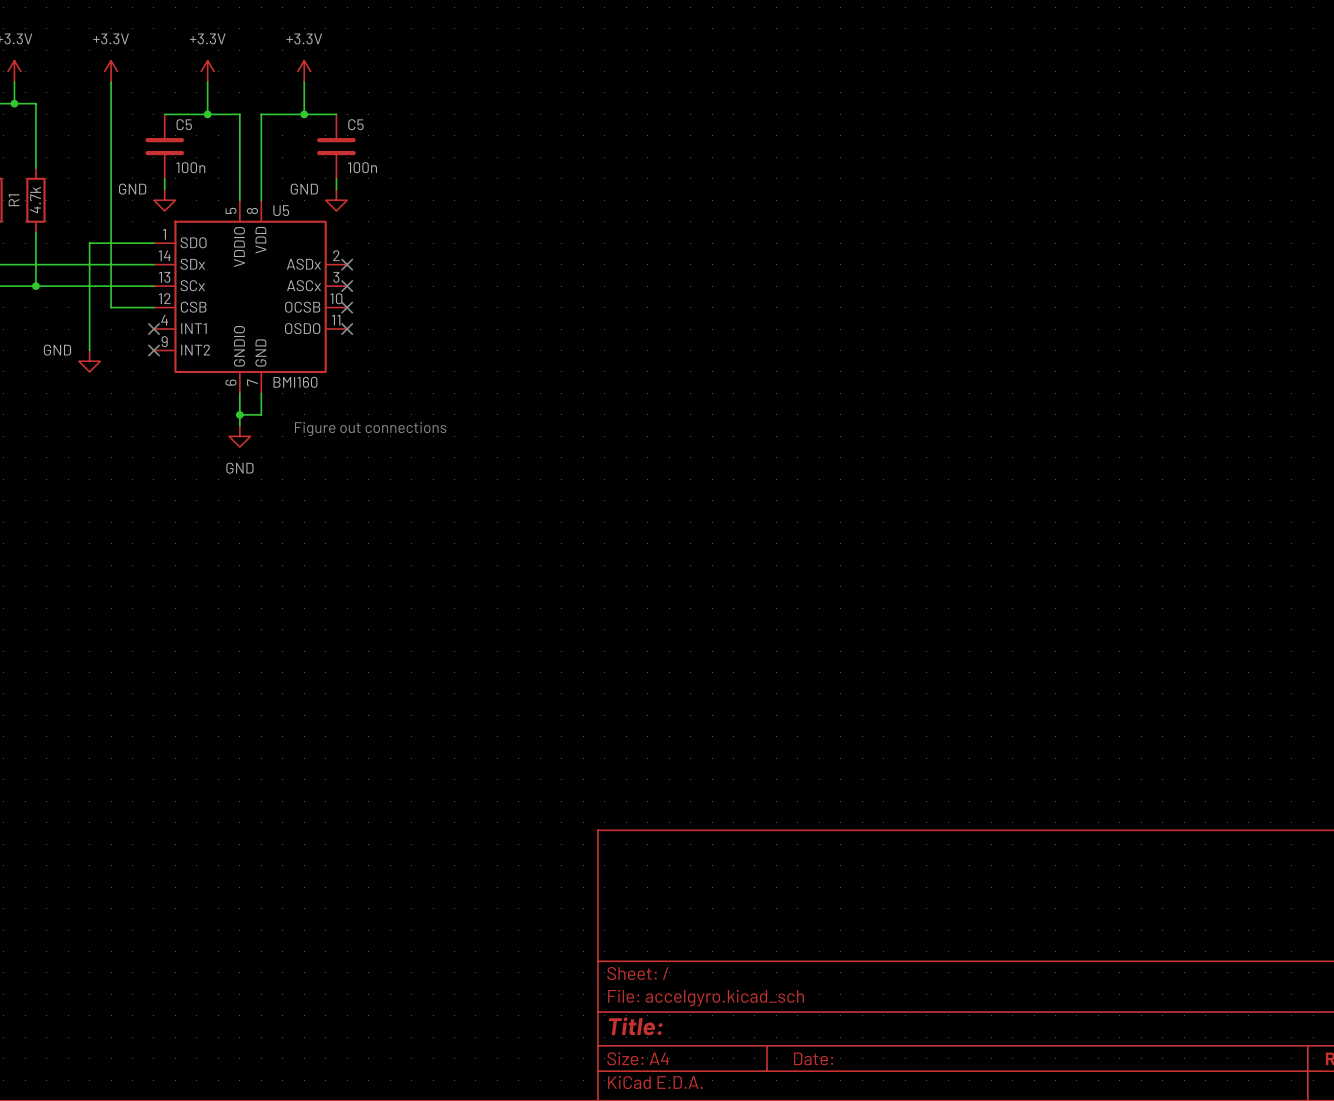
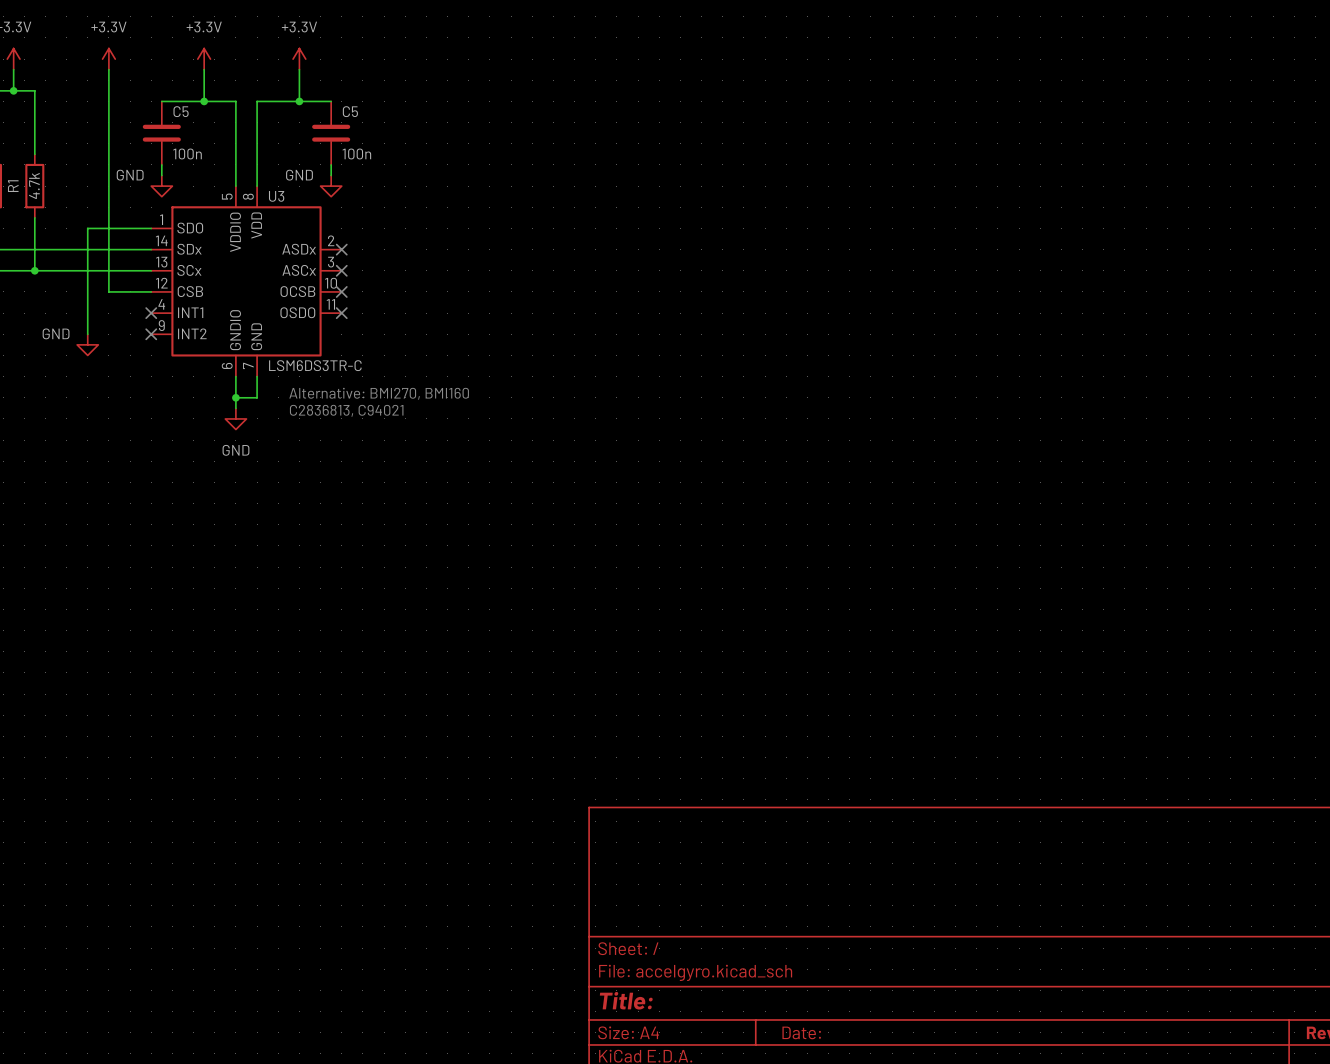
U5 name: U5 (281, 210) -> U3 (276, 196)
U5 value: BMI160 (295, 382) -> LSM6DS3TR-C (315, 365)
text: none -> Alternative: BMI270, BMI160 (379, 393)
text: Figure out connections (370, 429) -> C2836813, C94021 (346, 410)

